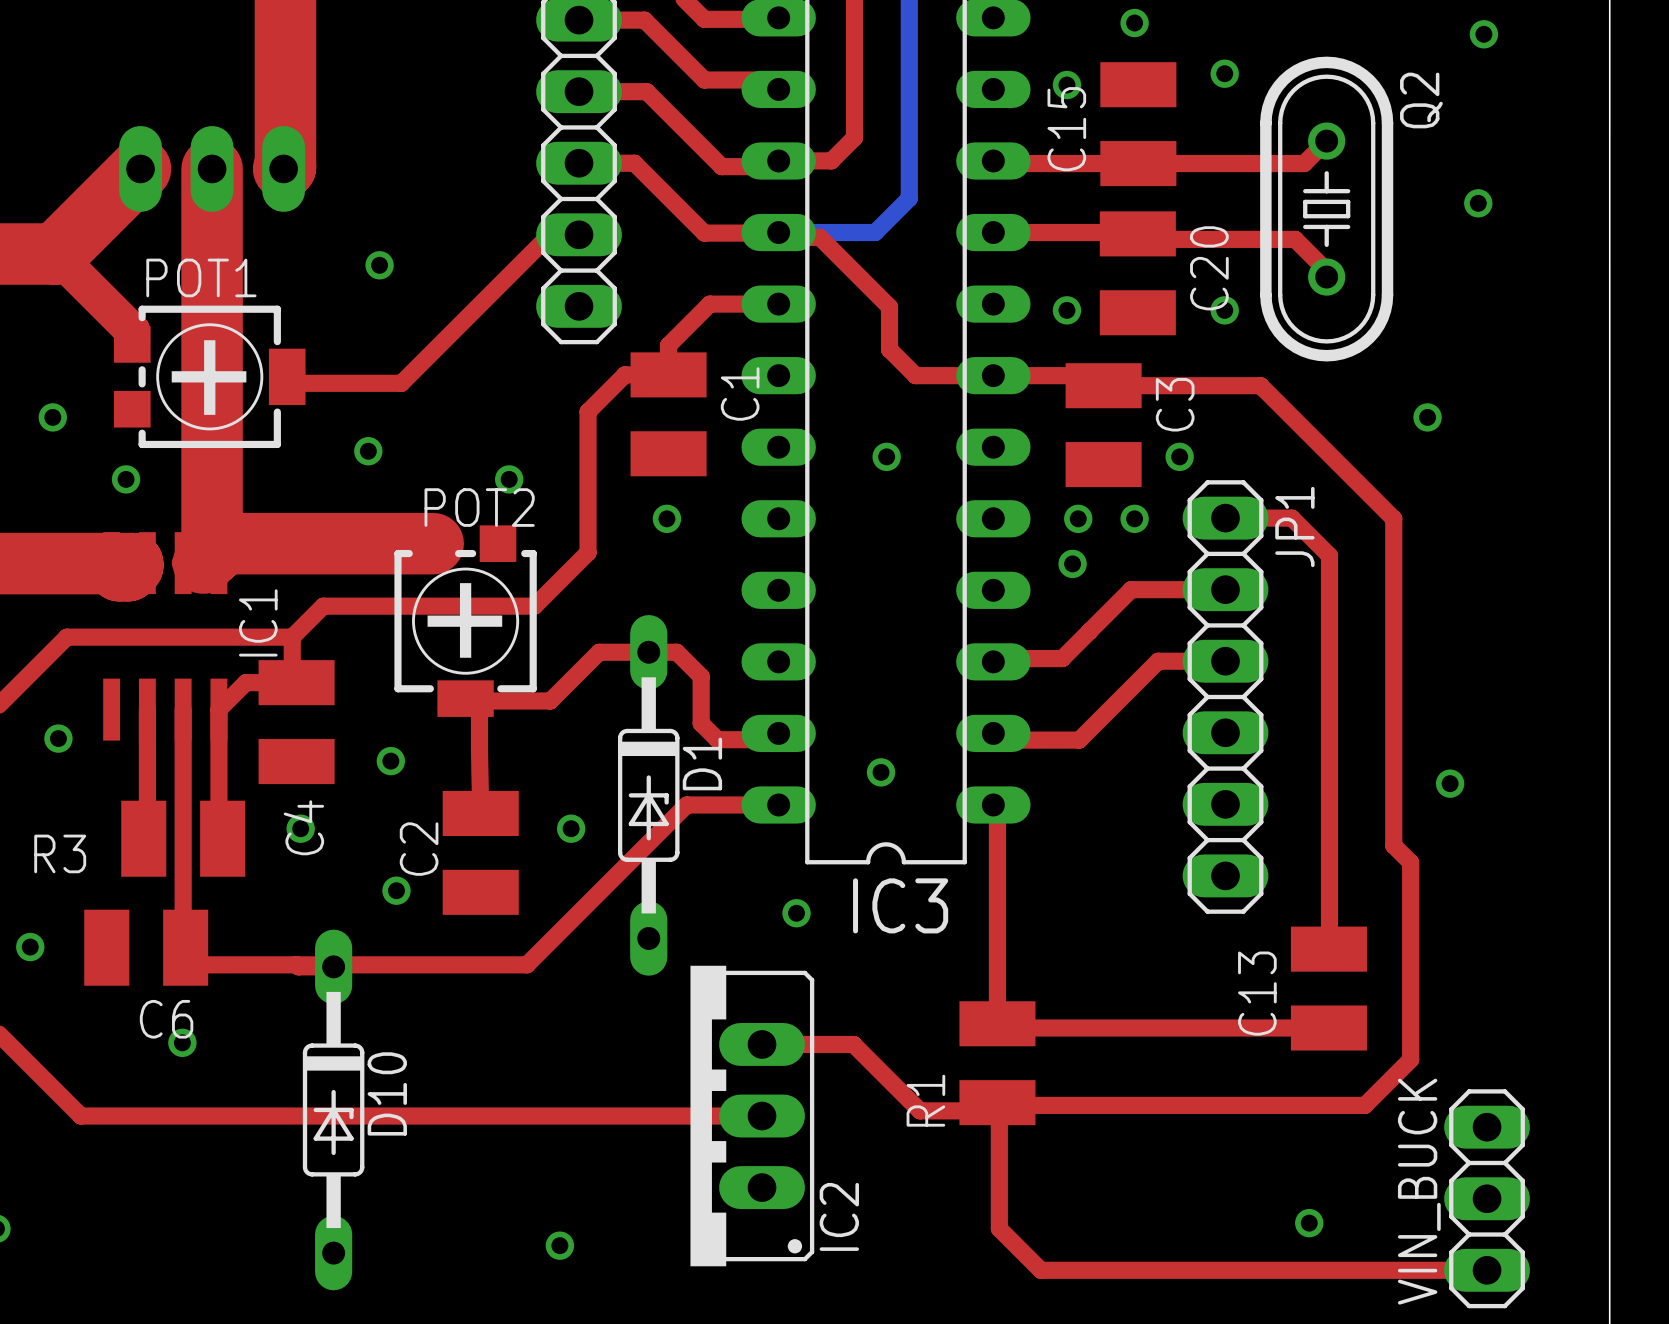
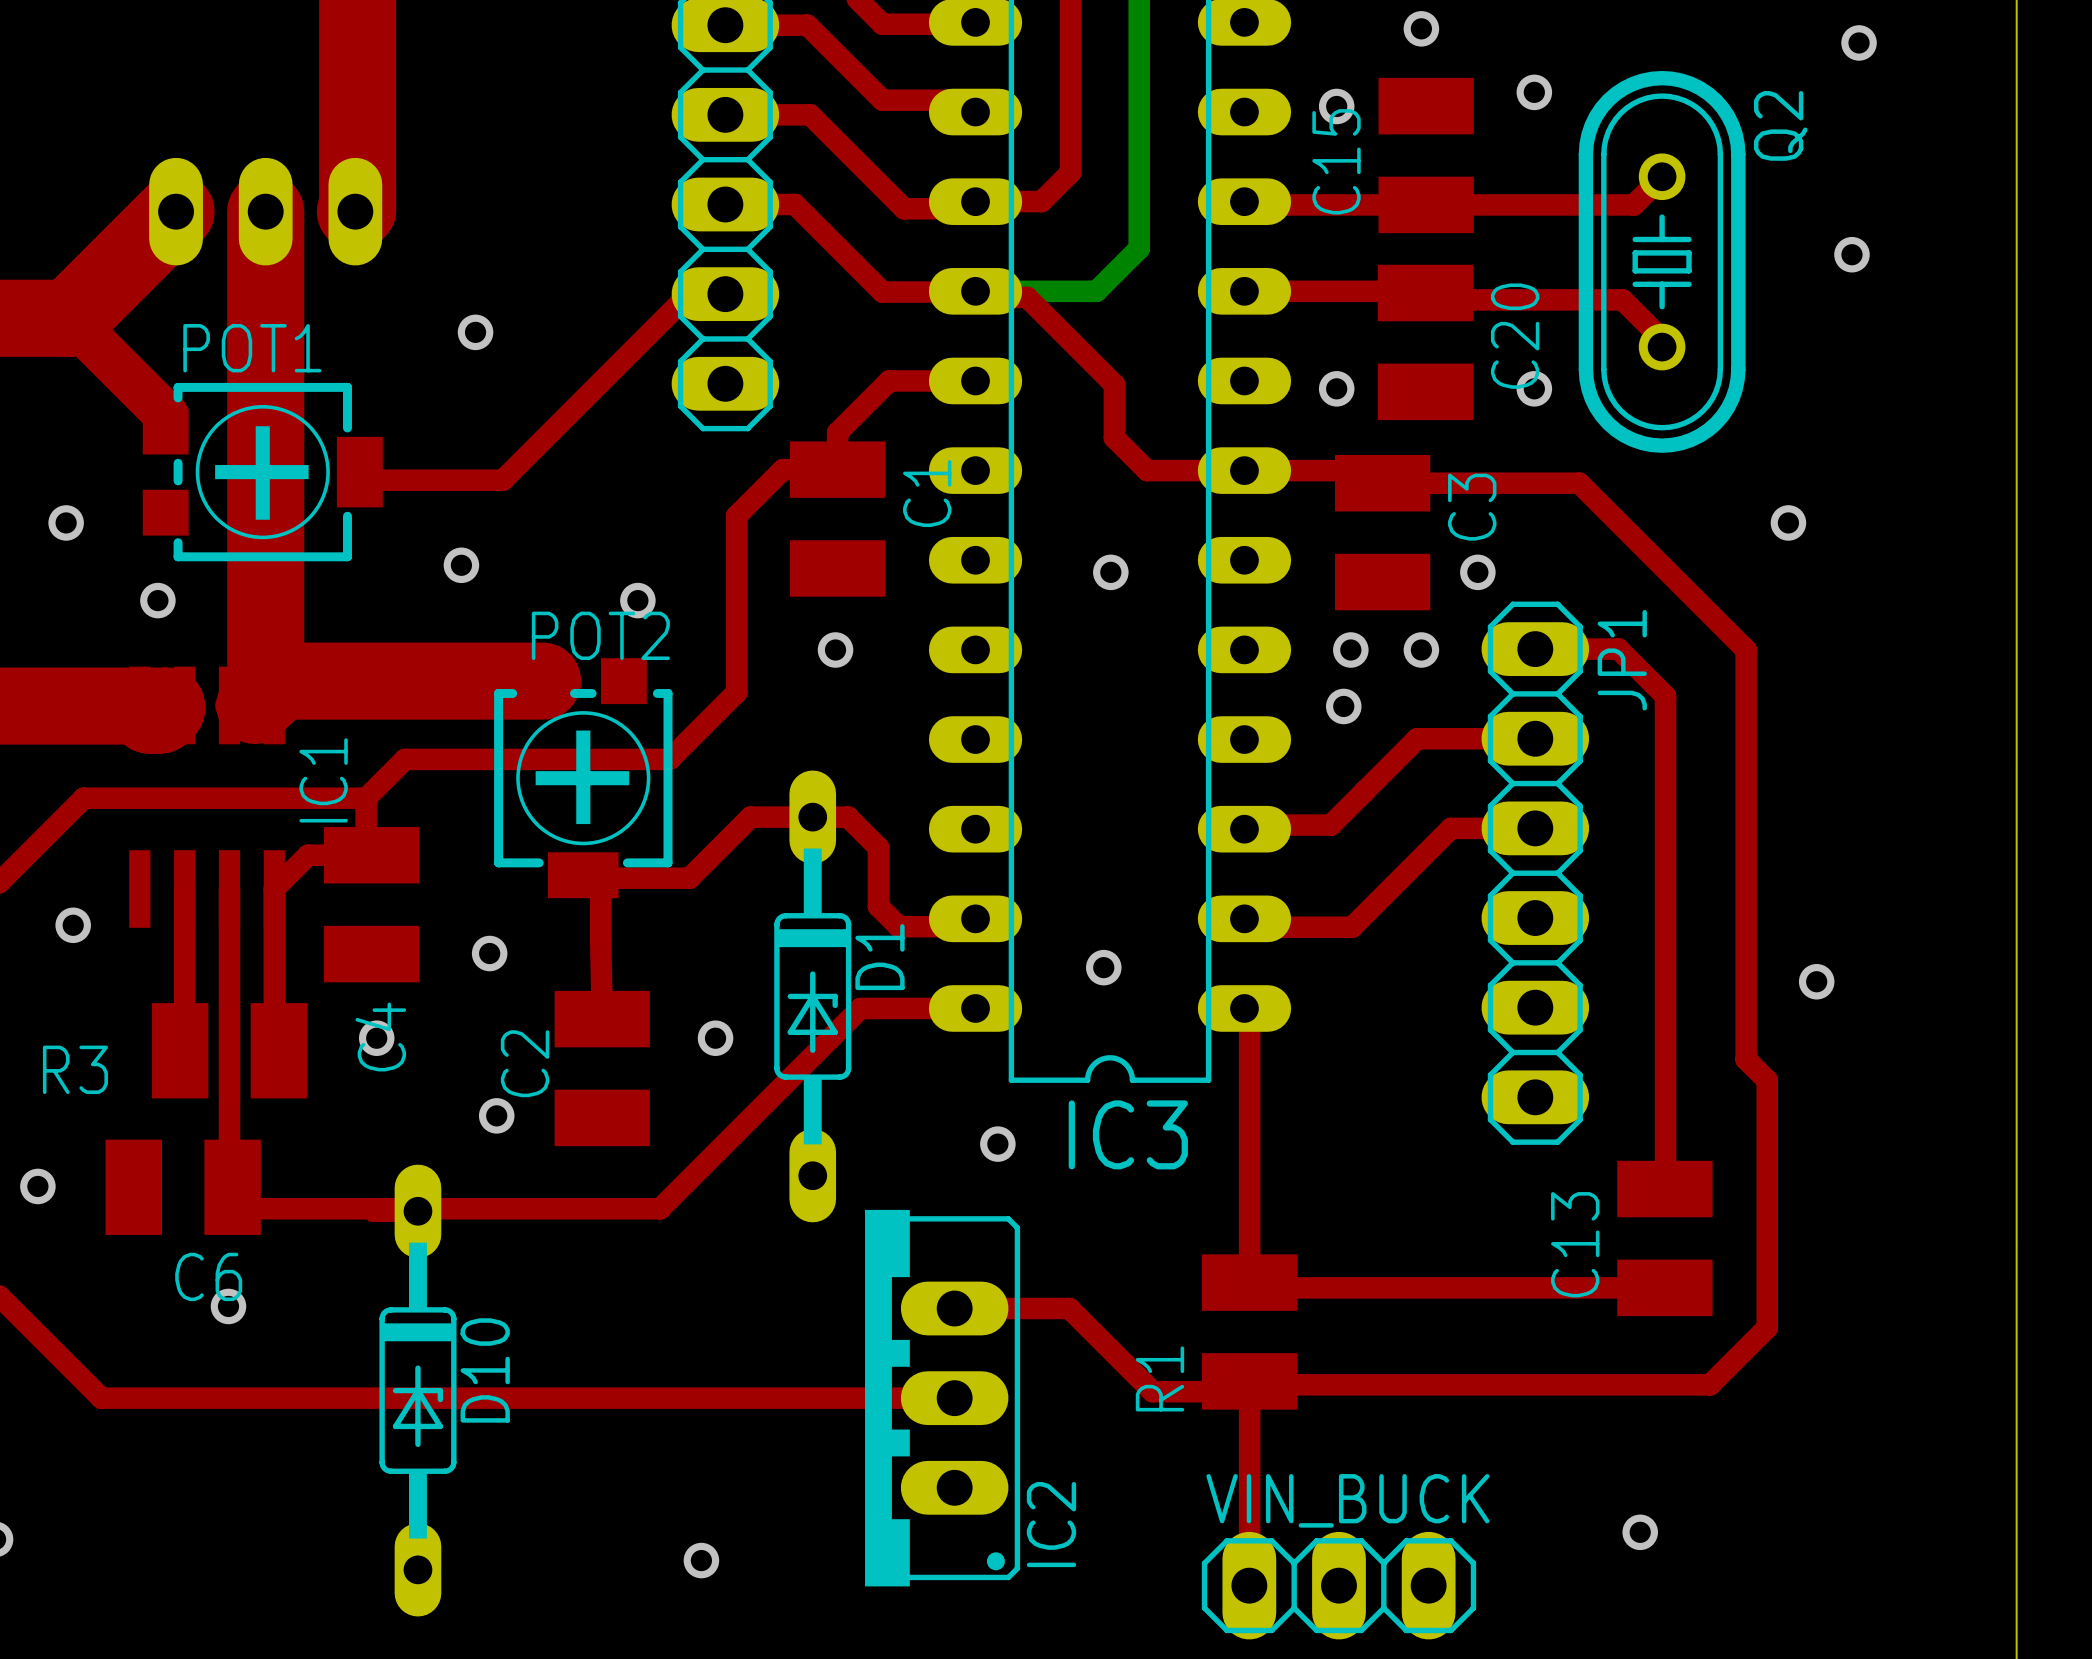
top track: (997, 1102) (999, 1104) (999, 1228) (1040, 1270) (1487, 1270) -> (1249, 1381) (1249, 1585)
VIN_BUCK rotation: 0° (1487, 1198) -> 90° clockwise (1338, 1585)
VIN_BUCK position: (1487, 1198) -> (1338, 1585)

